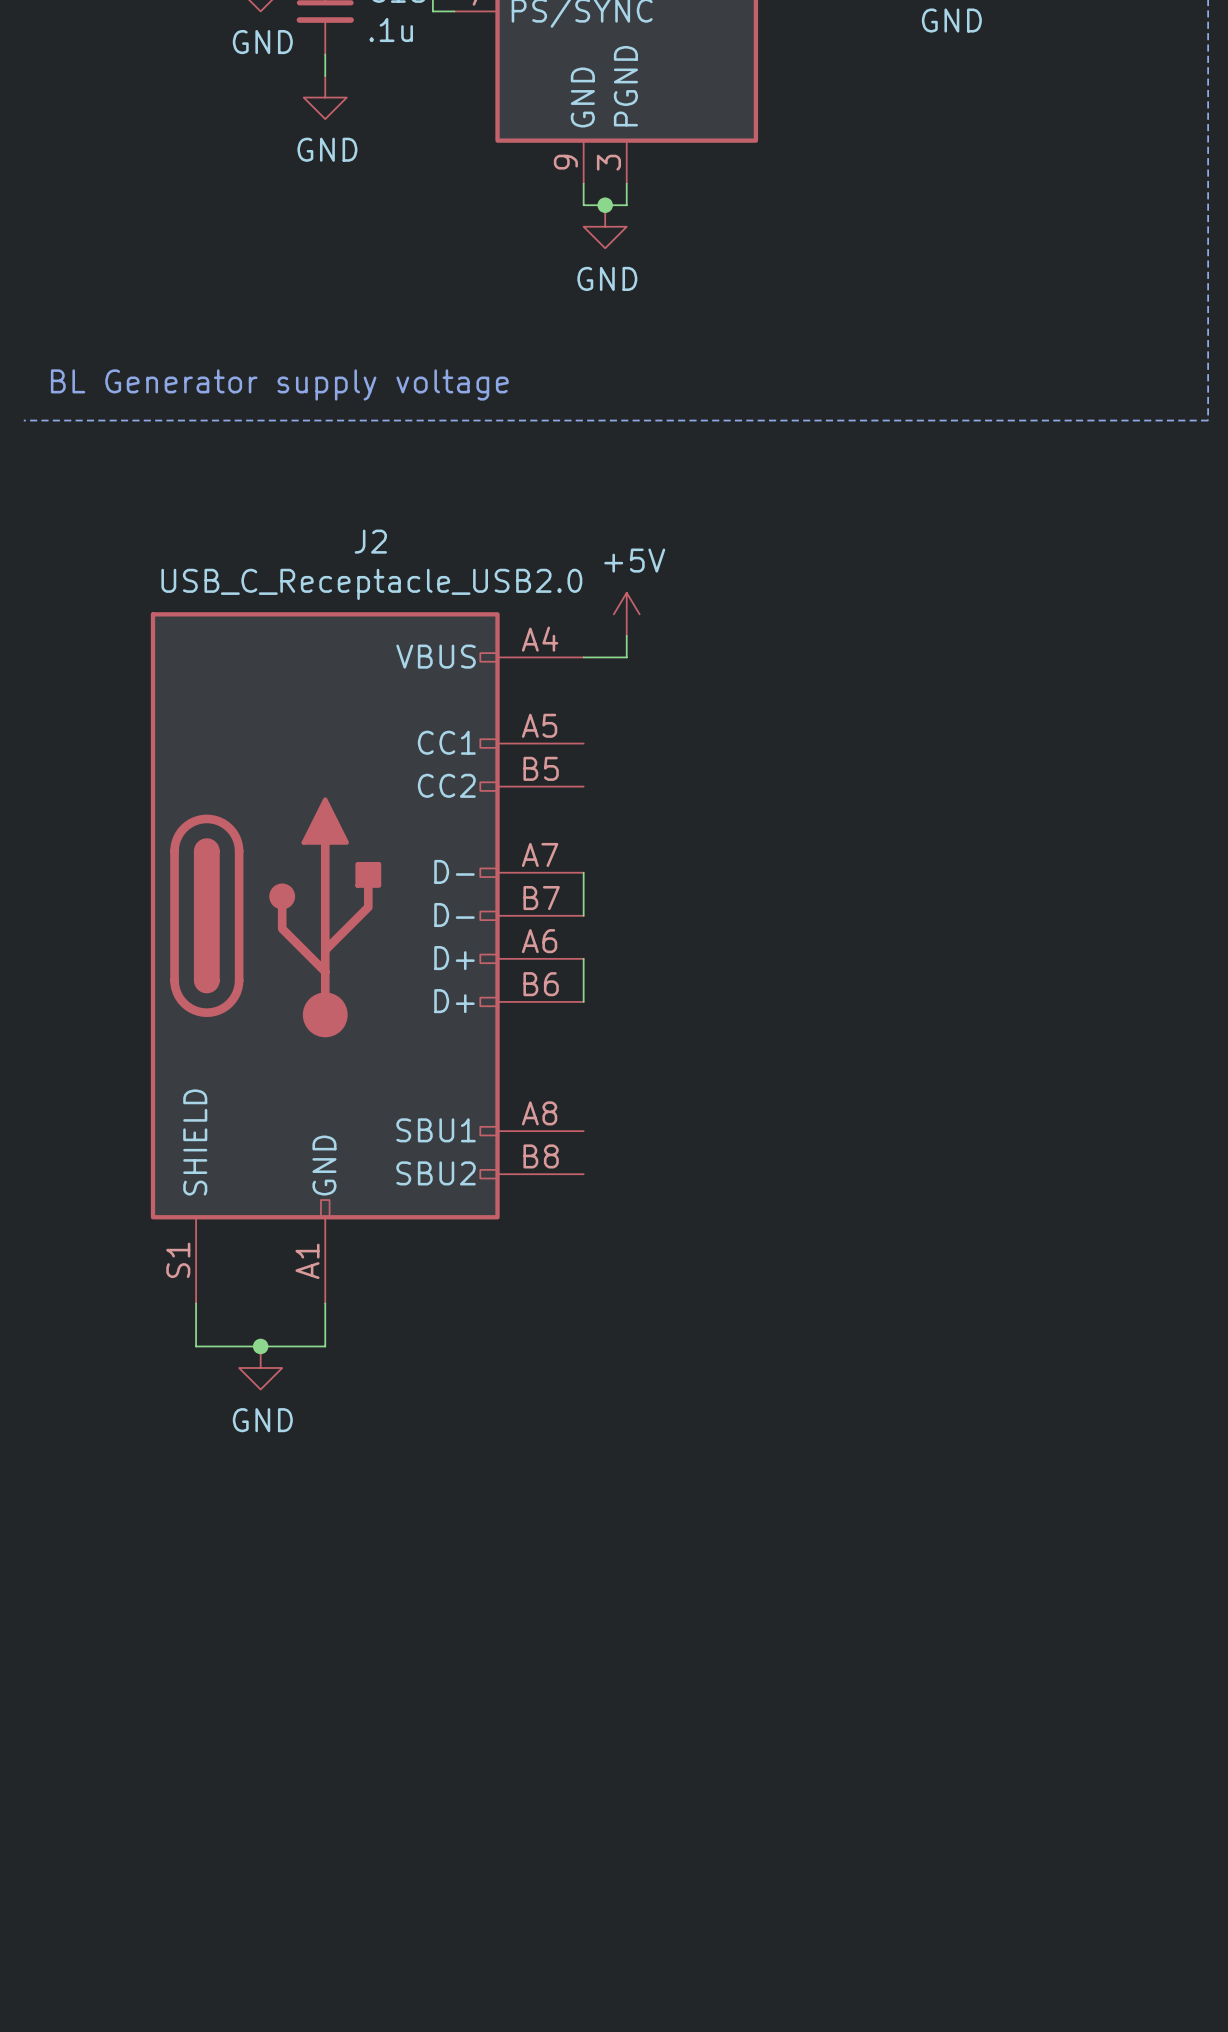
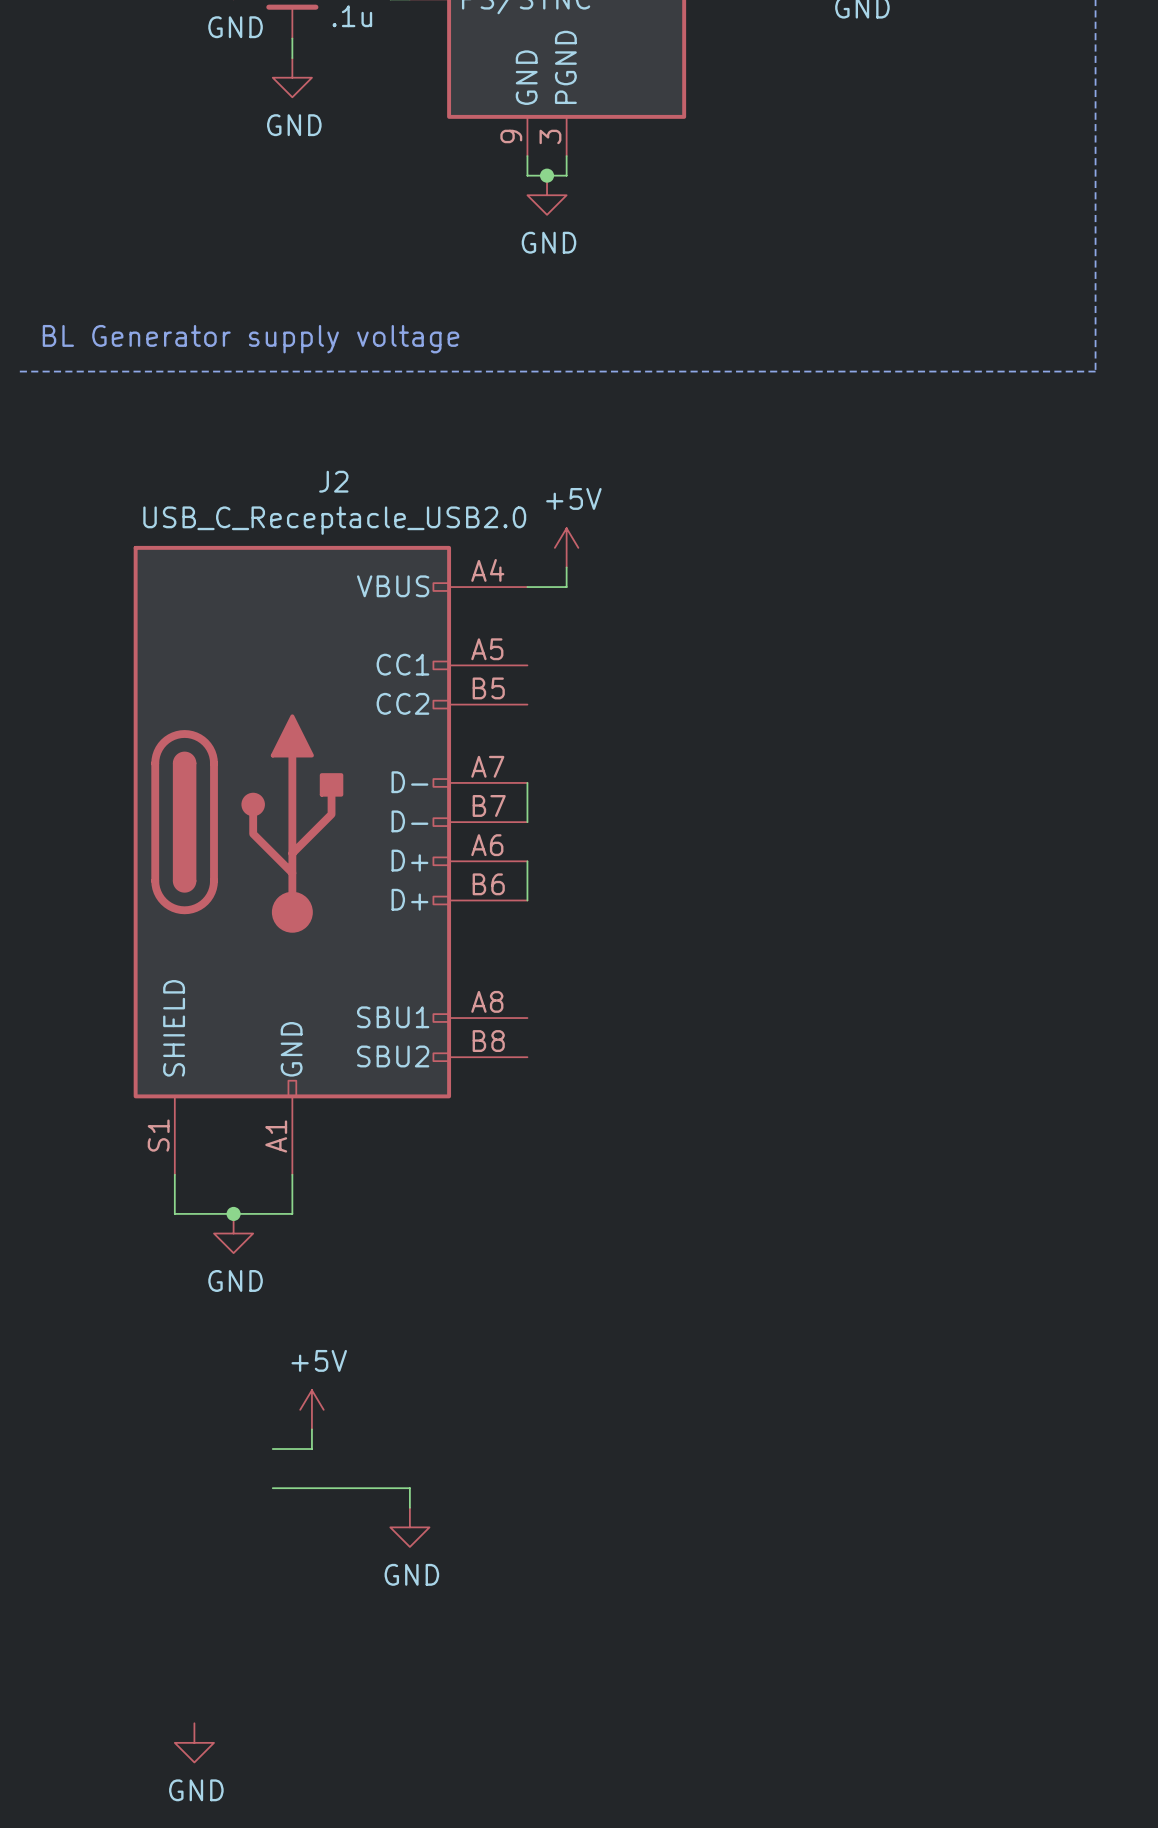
power symbol: none -> +5V (311, 1409)
wire: none -> (311, 1429) (311, 1449) (272, 1449)
wire: none -> (272, 1488) (409, 1488) (409, 1507)
power symbol: none -> GND (409, 1527)
power symbol: none -> GND (194, 1742)

